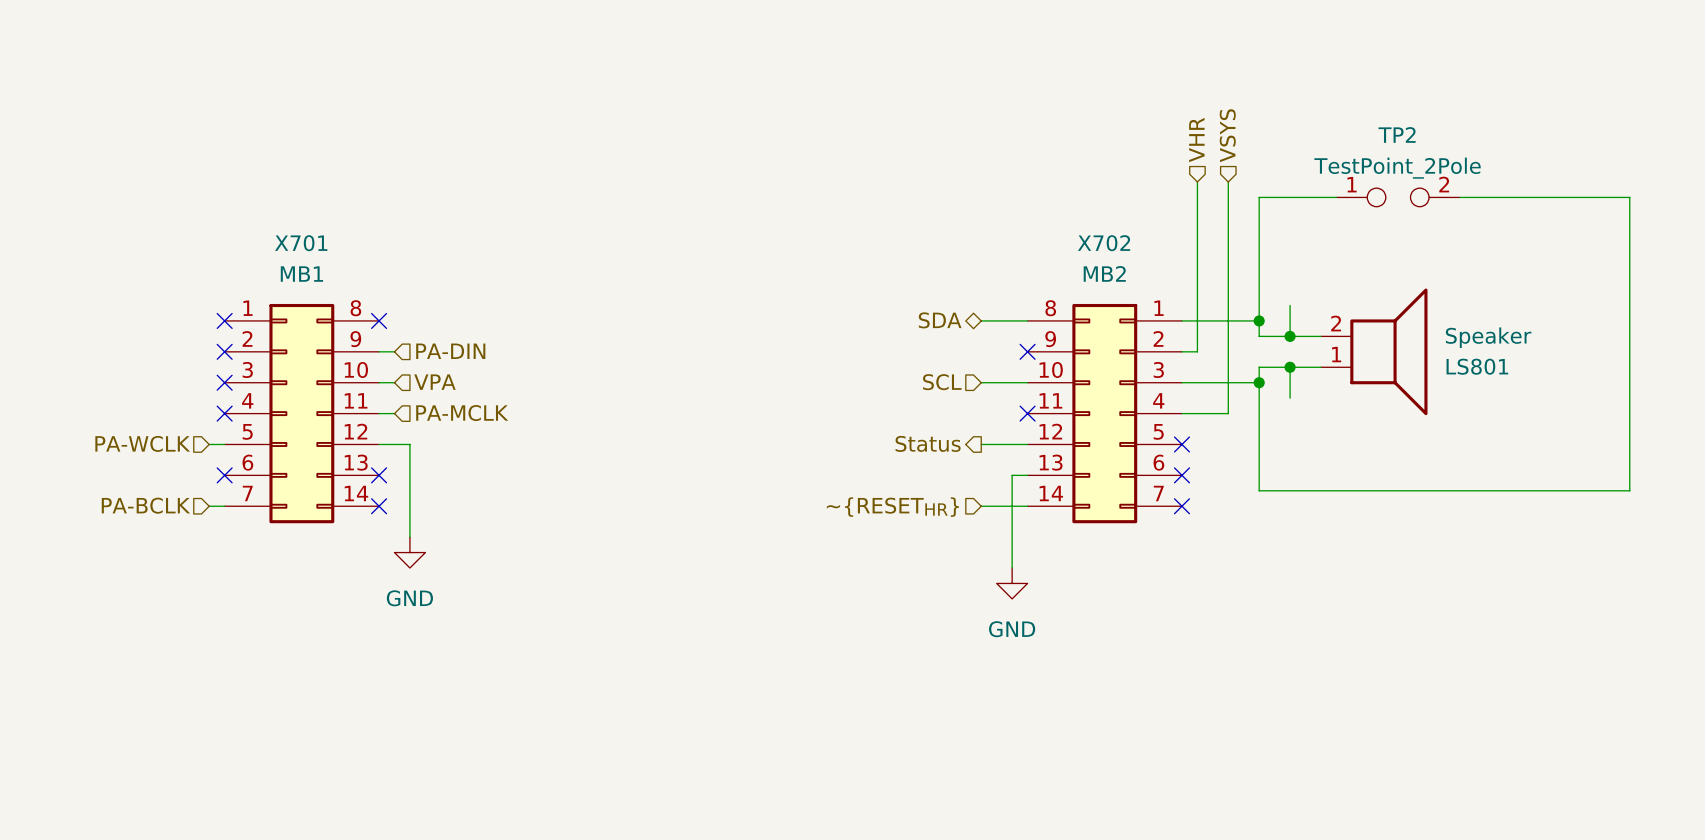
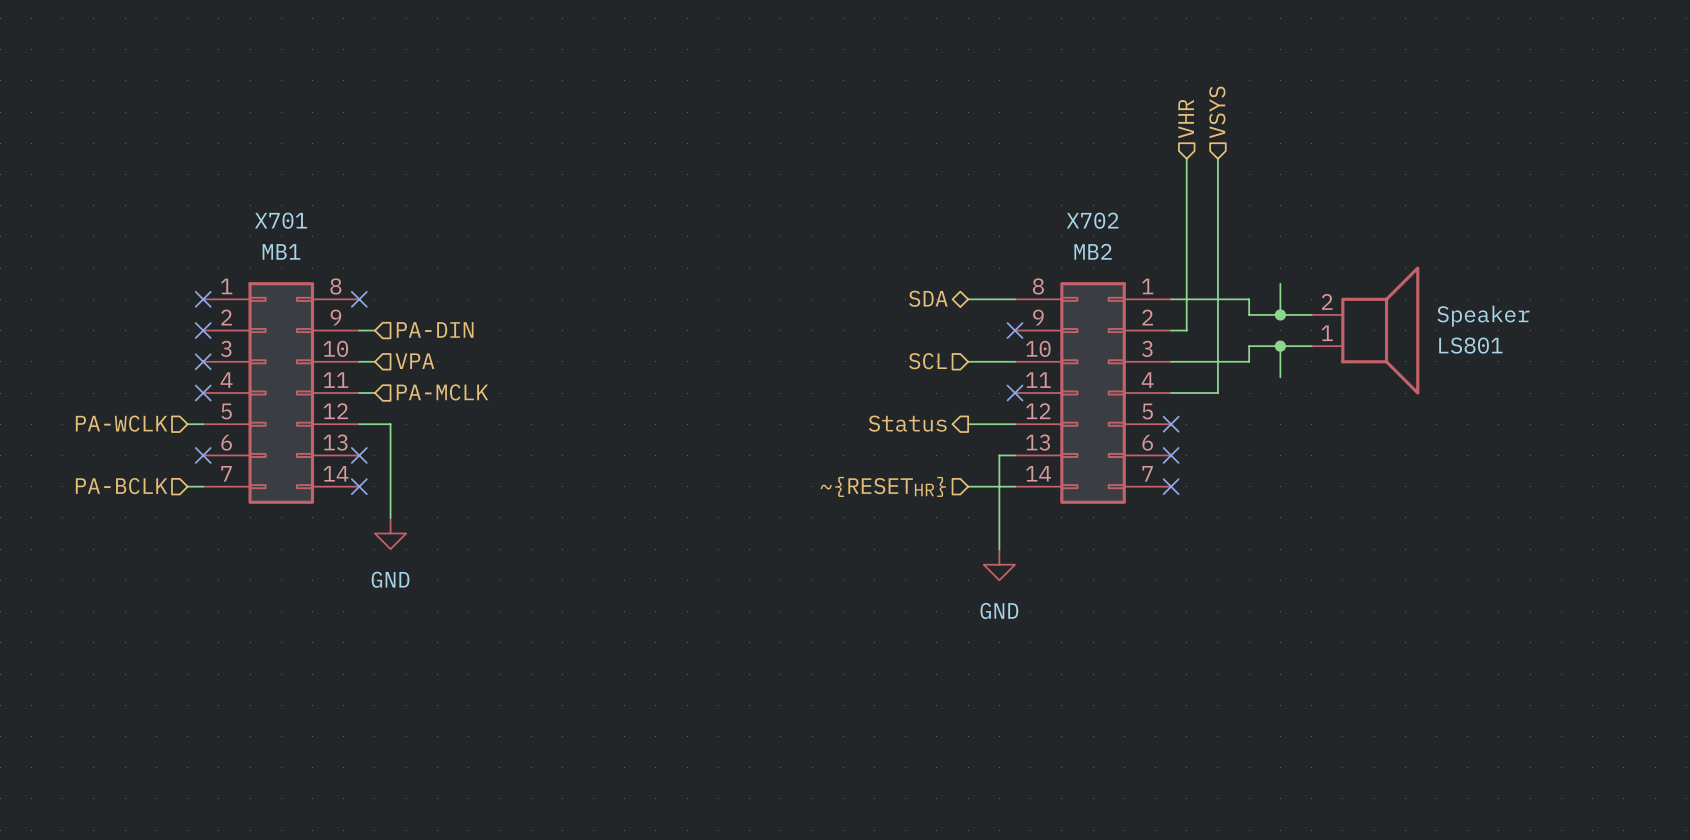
wire: (1336, 197) (1259, 197) (1259, 320) -> none
TP2: TestPoint_2Pole (1398, 197) -> none
wire: (1459, 197) (1629, 197) (1629, 490) (1259, 490) (1259, 382) -> none
junction: (1259, 320) -> none
junction: (1259, 382) -> none

